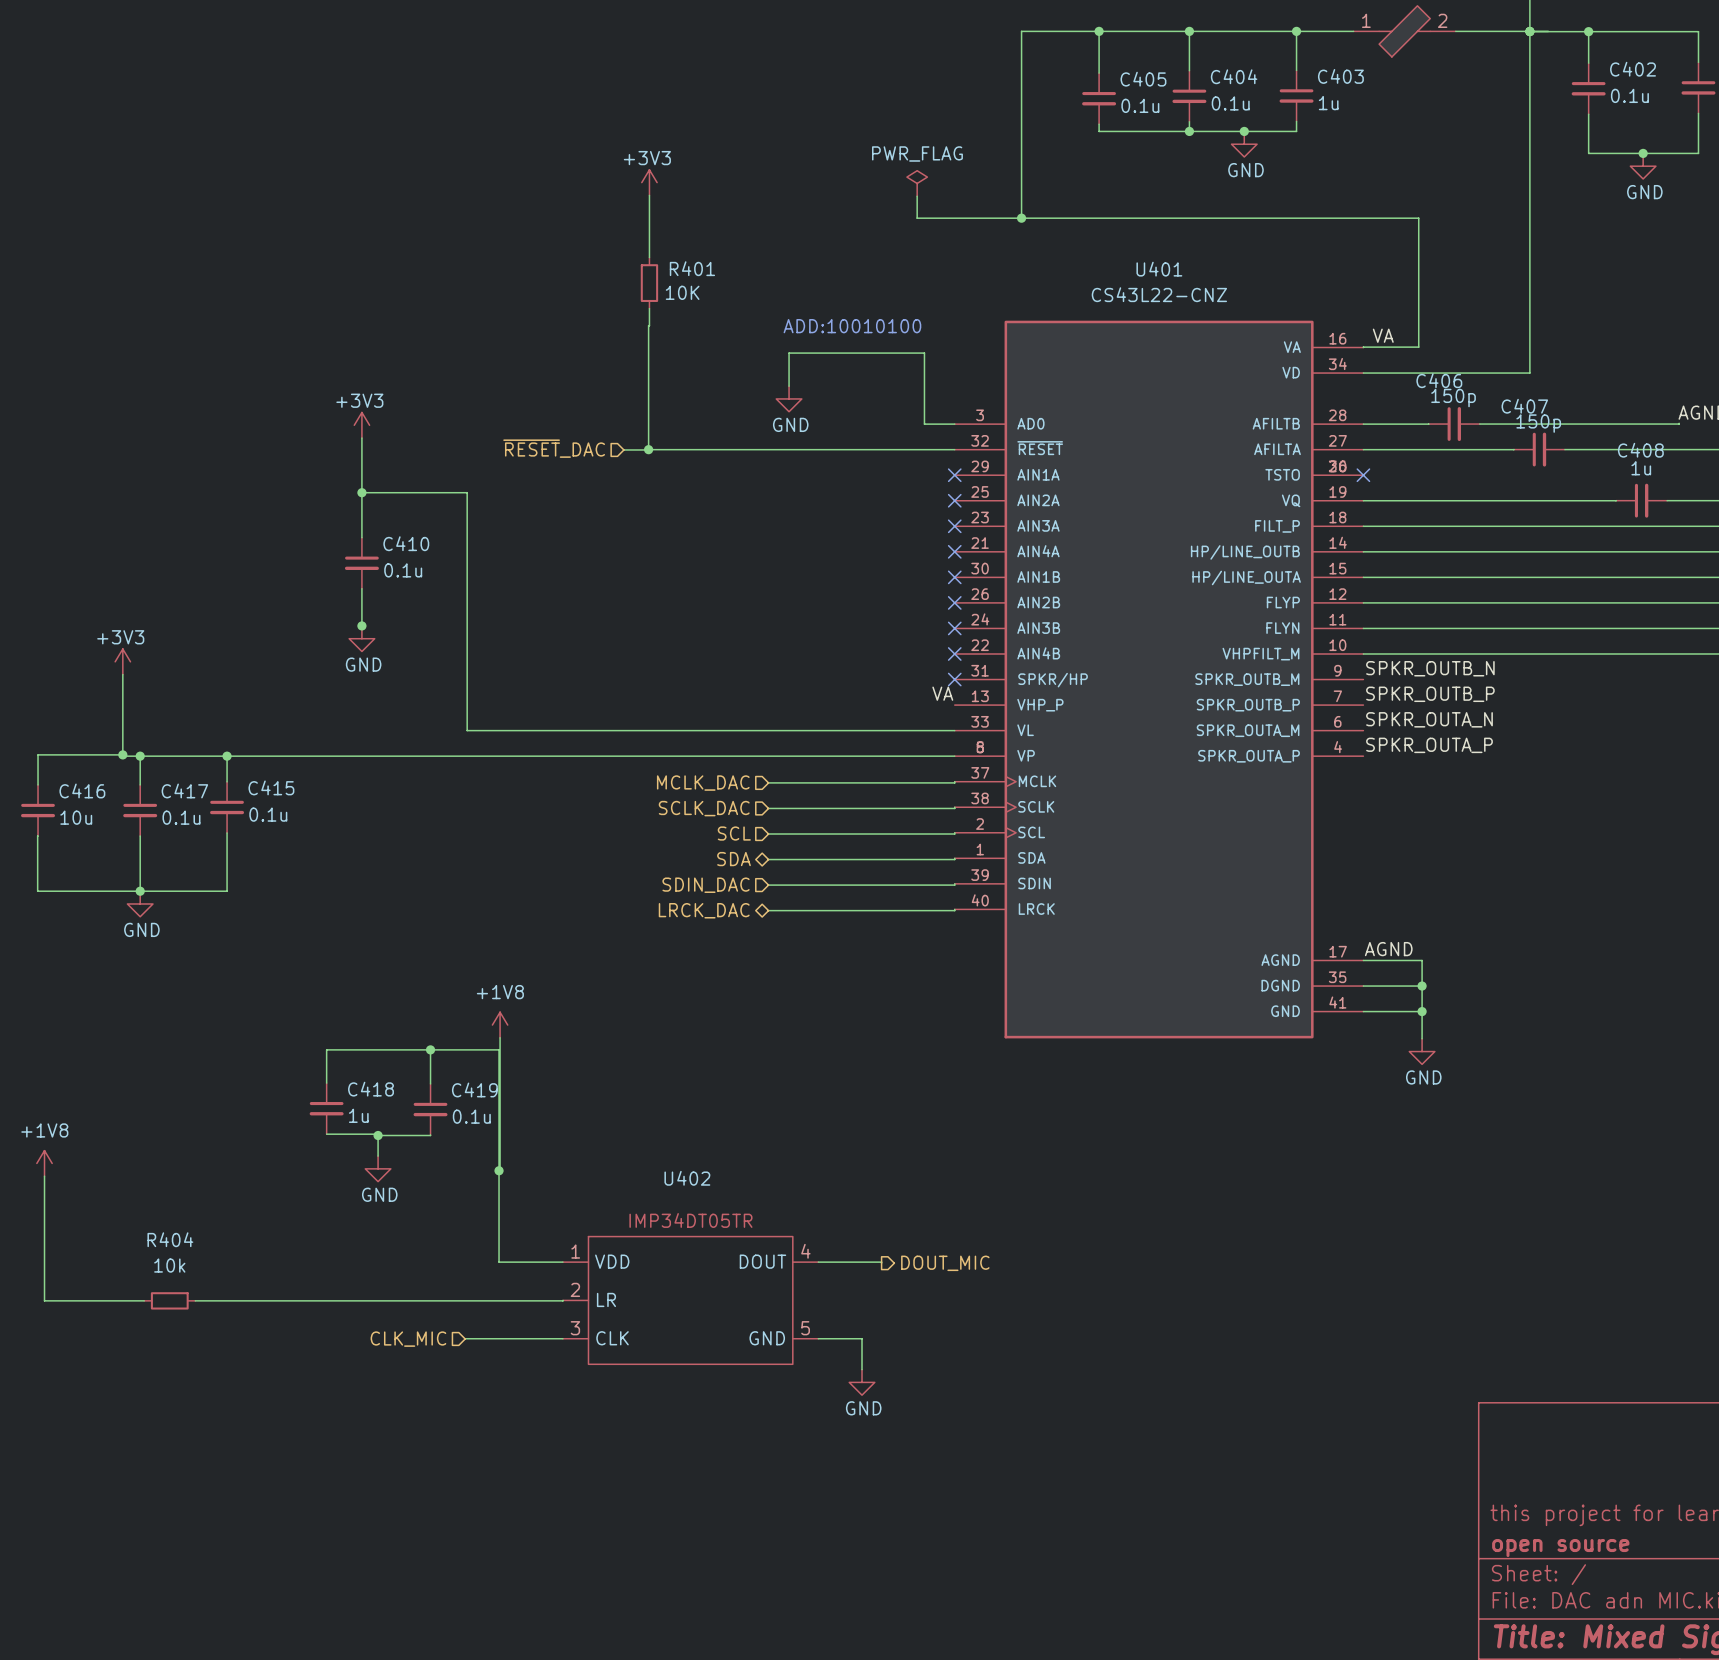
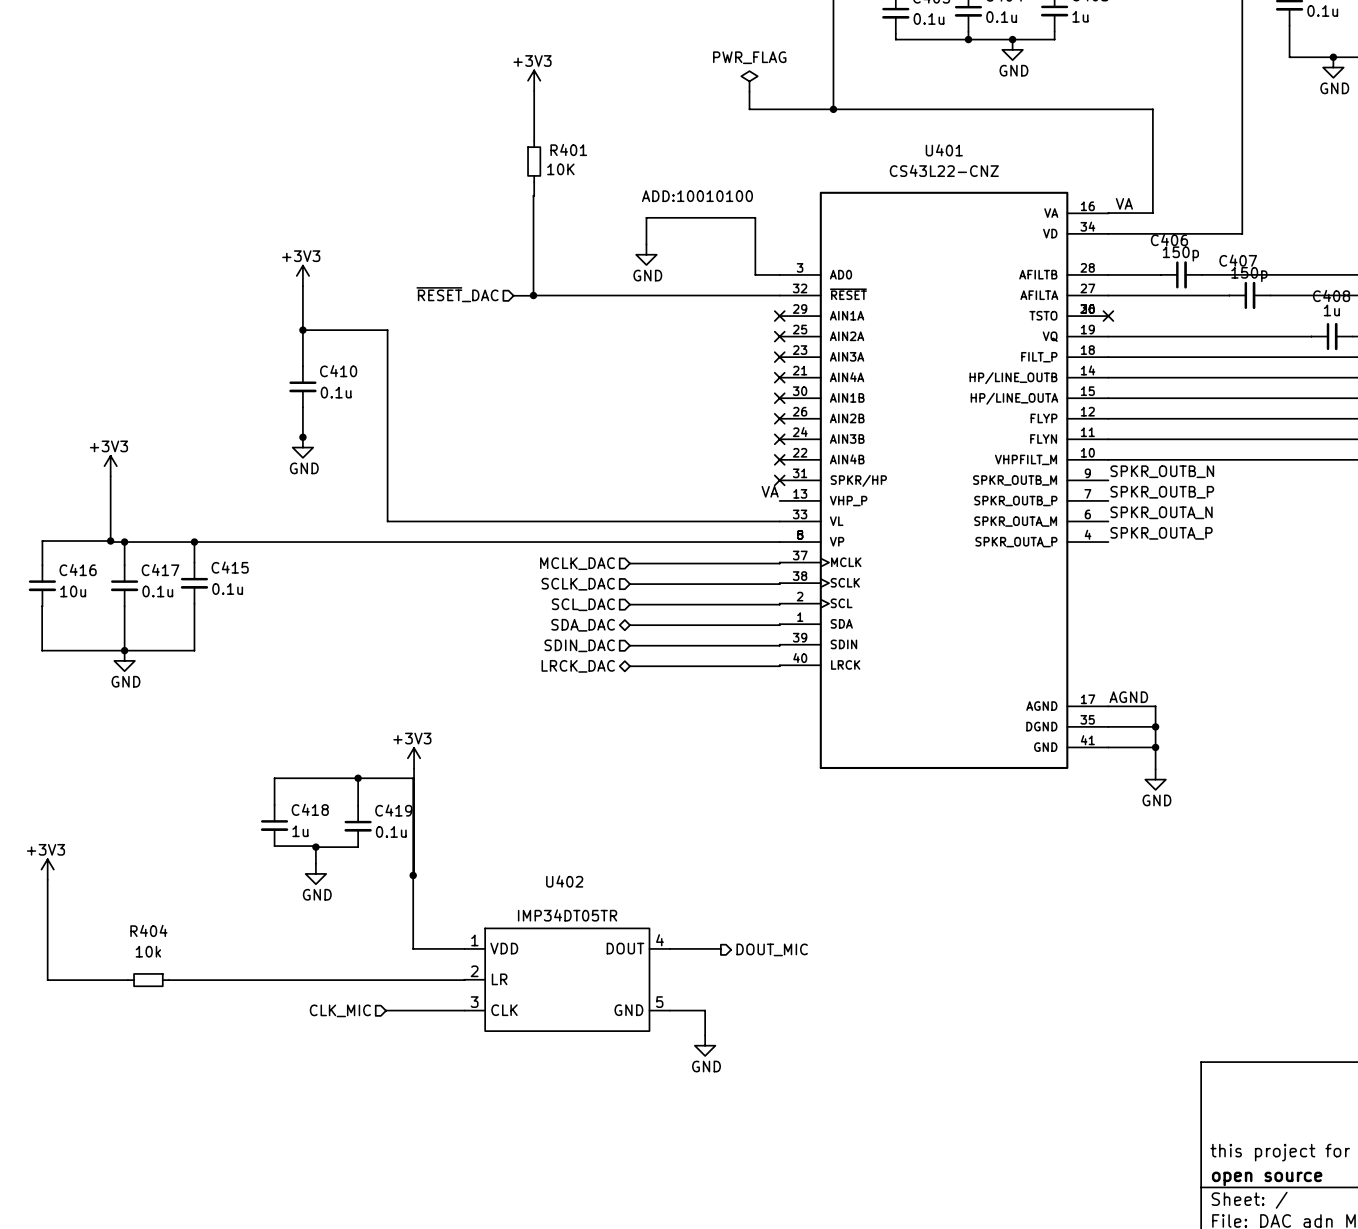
hierarchical label: SCL (734, 833) -> SCL_DAC (583, 604)
hierarchical label: SDA (734, 859) -> SDA_DAC (583, 625)
power symbol: +1V8 (500, 1025) -> +3V3 (414, 758)
power symbol: +1V8 (44, 1163) -> +3V3 (47, 869)

